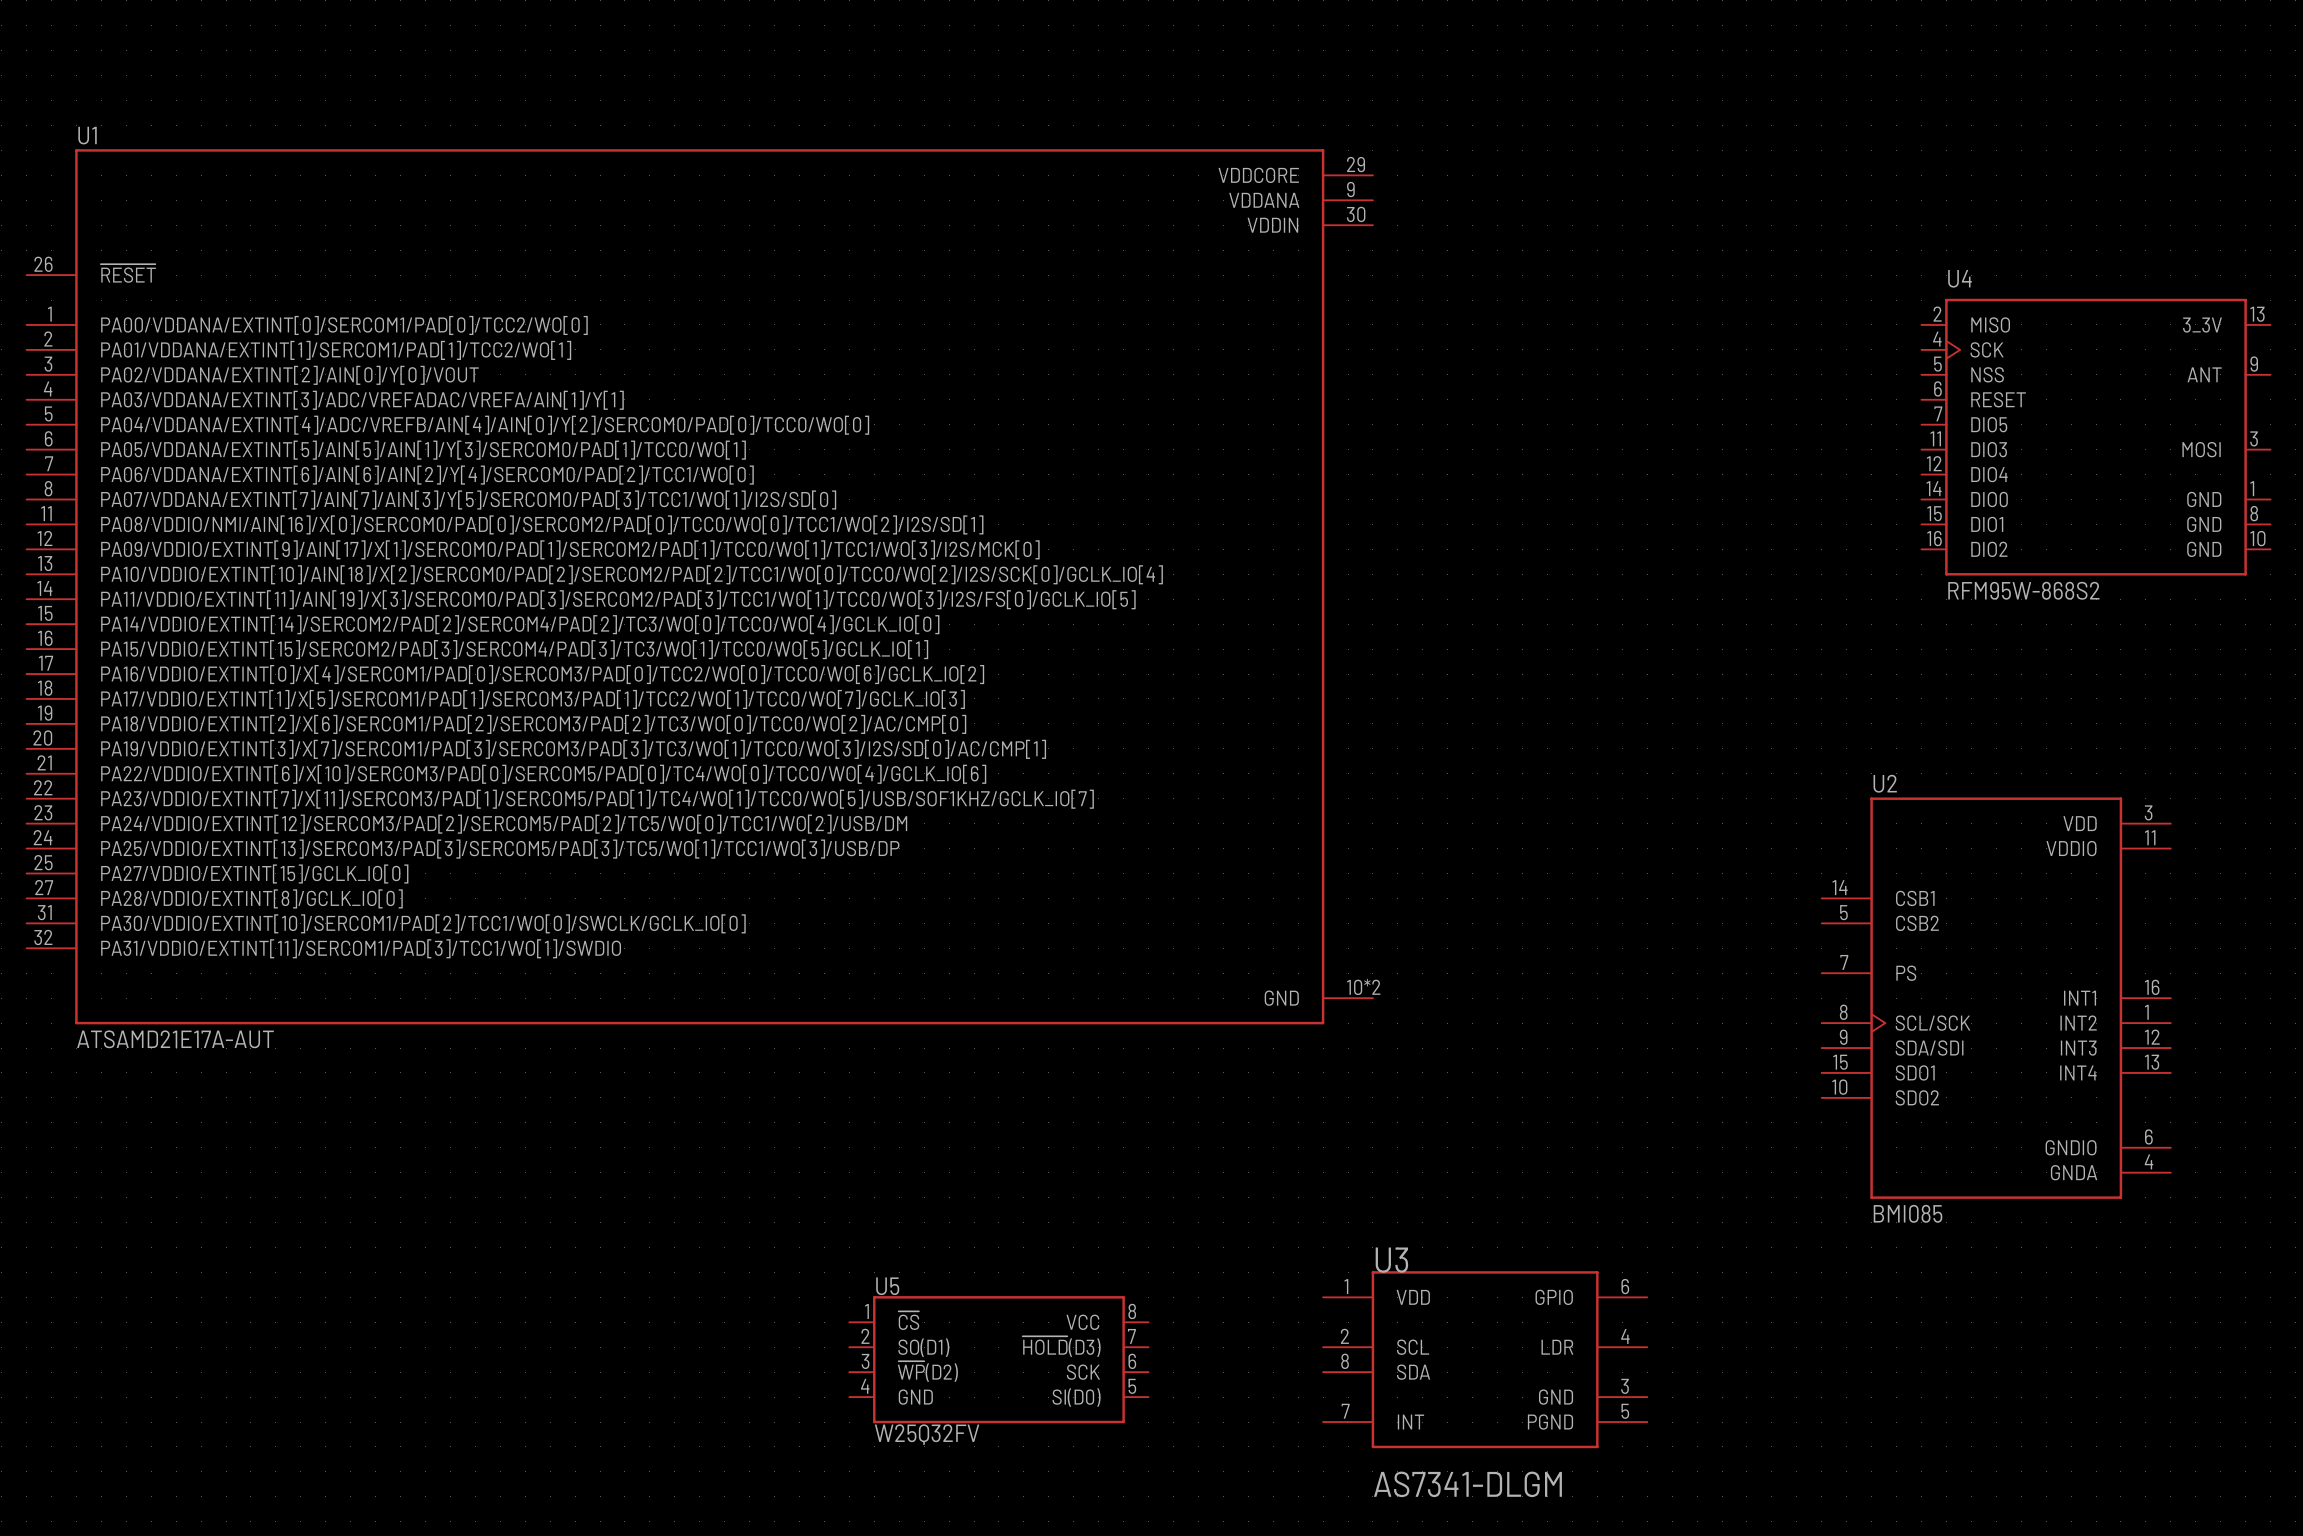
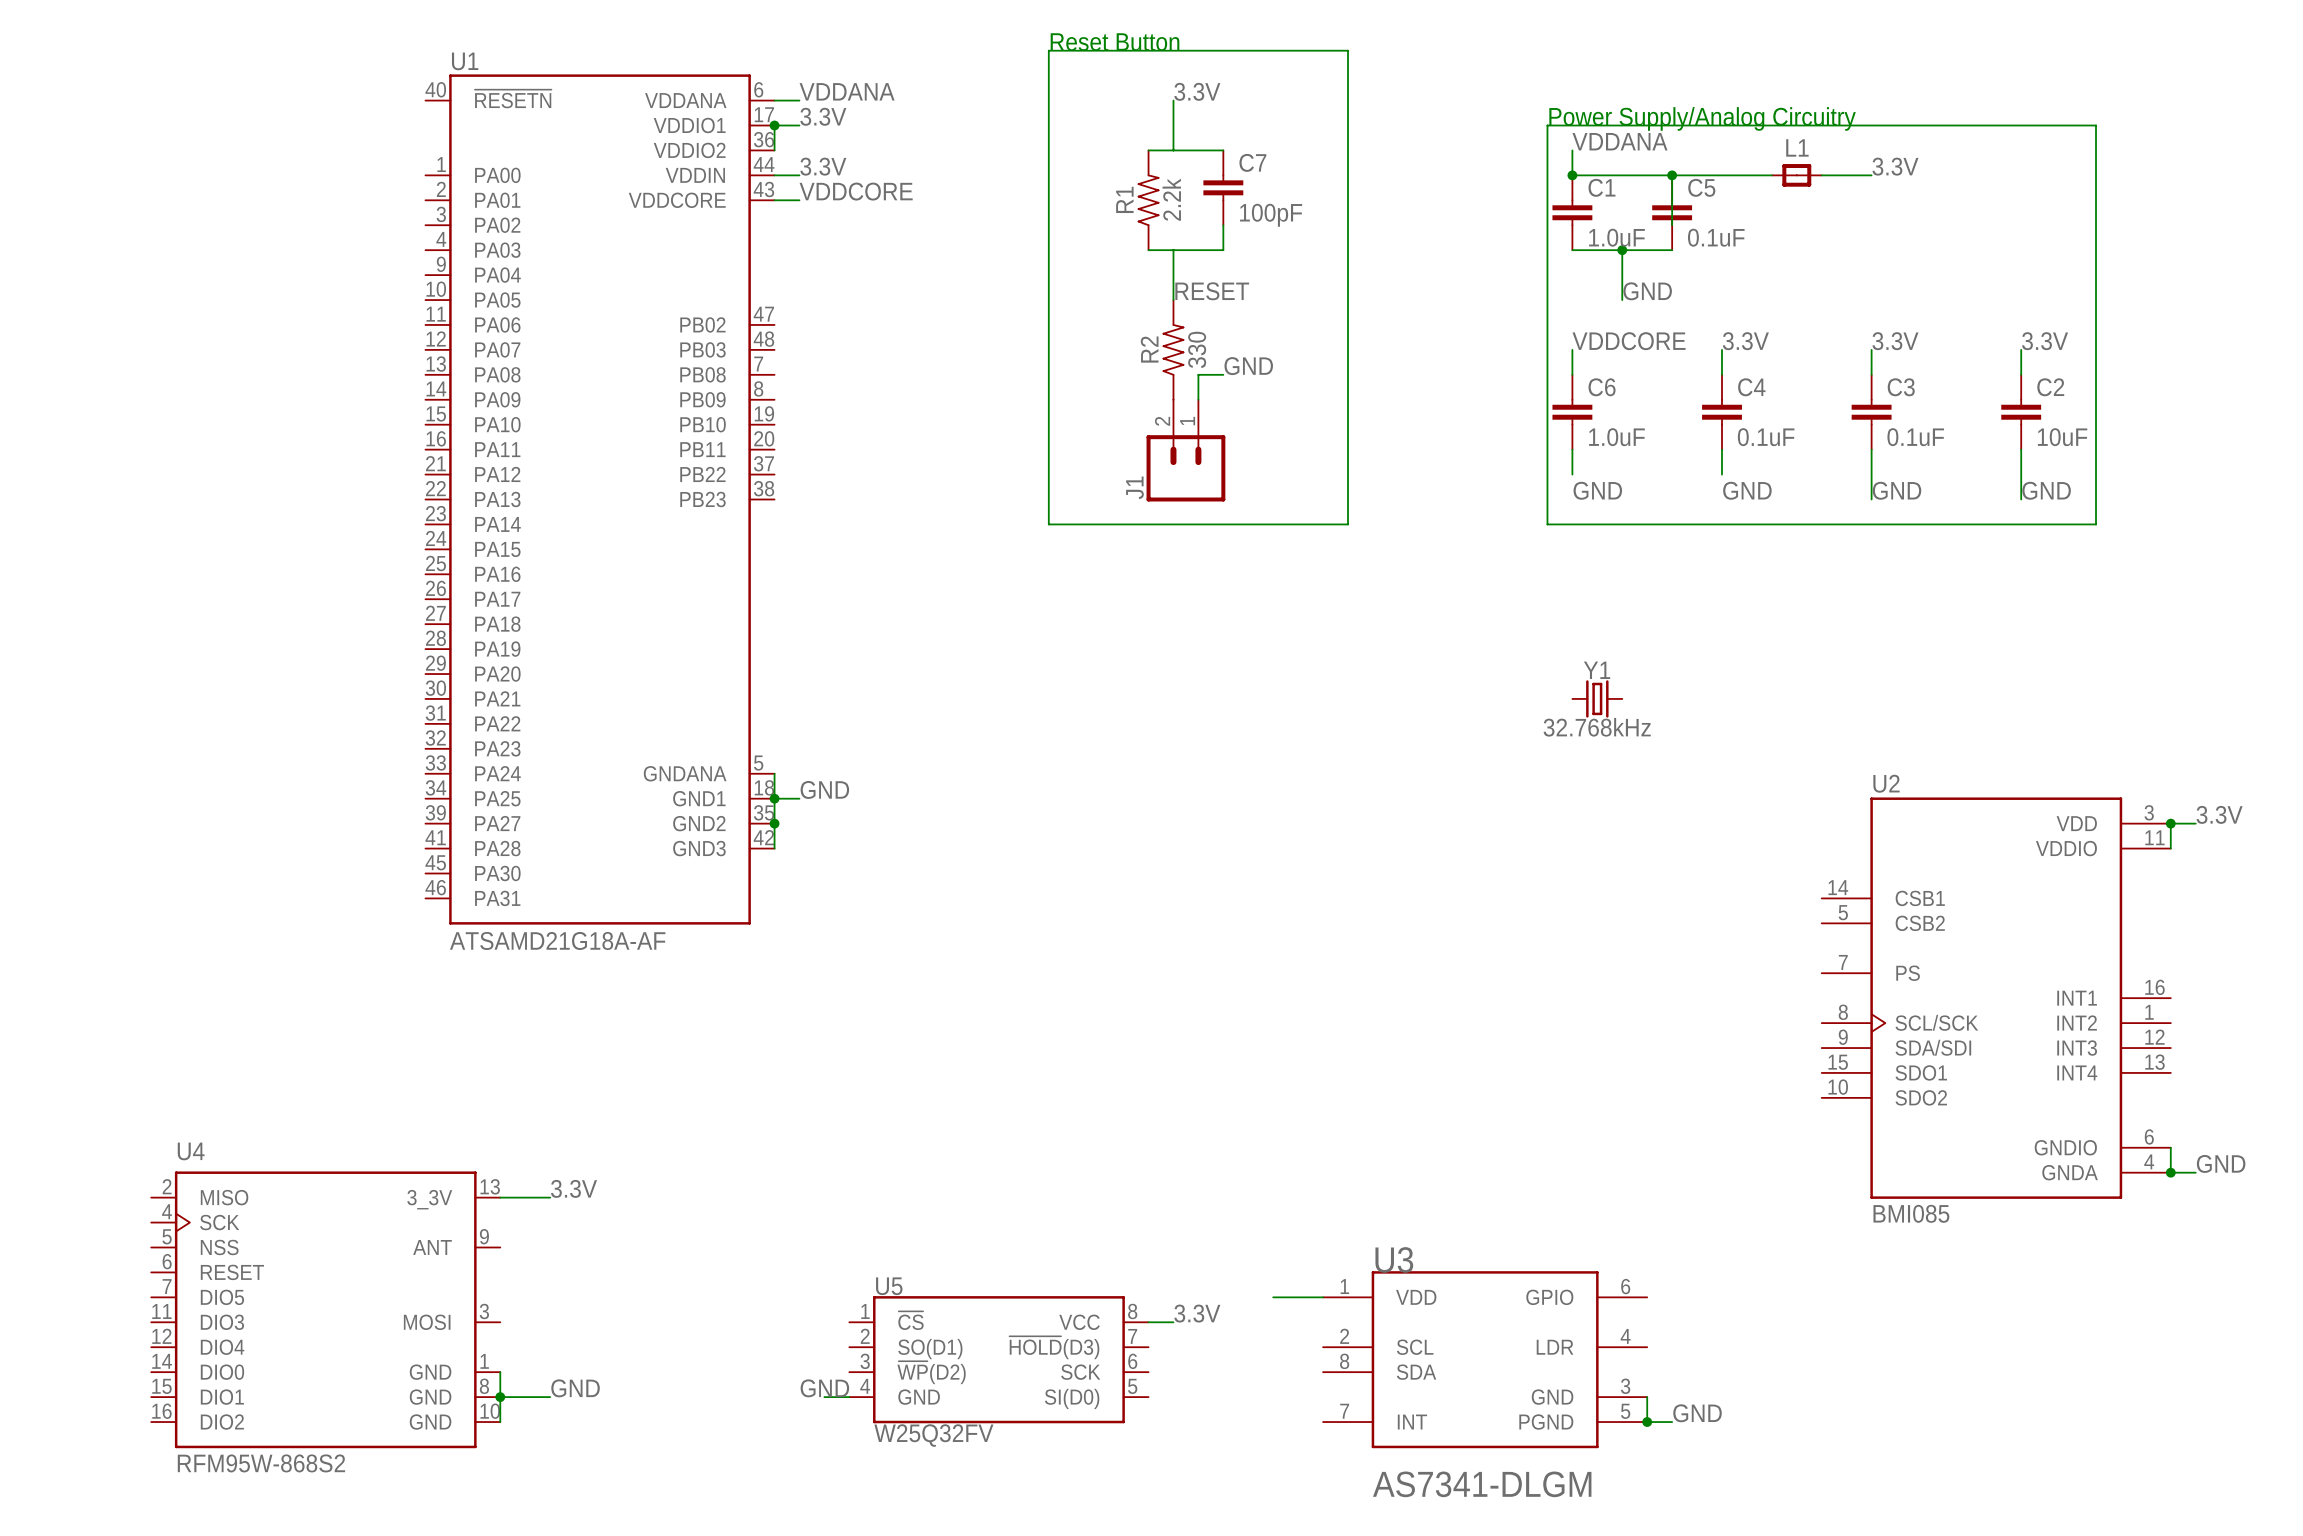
text: none -> Reset Button (1115, 42)
wire: none -> (1048, 50) (1348, 50) (1348, 524) (1048, 524) (1048, 50)
label: none -> VDDANA (847, 91)
label: none -> 3.3V (1197, 91)
wire: none -> (774, 100) (799, 100)
wire: none -> (1173, 100) (1173, 150)
label: none -> 3.3V (823, 116)
text: none -> Power Supply/Analog Circuitry (1702, 118)
junction: none -> (774, 125)
wire: none -> (799, 125) (774, 125) (774, 150)
wire: none -> (1547, 125) (2096, 125) (2096, 524) (1547, 524) (1547, 125)
U1 name position: U1 (87, 135) -> U1 (465, 61)
label: none -> VDDANA (1620, 141)
U1 symbol: [26, 149, 1373, 1025] -> [425, 74, 775, 925]
wire: none -> (1572, 150) (1572, 175) (1771, 175)
label: none -> 3.3V (823, 166)
label: none -> 3.3V (1895, 166)
wire: none -> (774, 175) (799, 175)
junction: none -> (1572, 175)
wire: none -> (1672, 175) (1672, 225)
junction: none -> (1672, 175)
L1: none -> (1796, 175)
wire: none -> (1821, 175) (1871, 175)
C7: none -> 100pF (1223, 187)
label: none -> VDDCORE (856, 191)
wire: none -> (774, 200) (799, 200)
R1: none -> 2.2k (1148, 200)
C1: none -> 1.0uF (1572, 212)
C5: none -> 0.1uF (1672, 212)
wire: none -> (1223, 225) (1223, 250) (1148, 250)
wire: none -> (1173, 250) (1173, 300)
wire: none -> (1572, 250) (1672, 250)
wire: none -> (1622, 250) (1622, 300)
junction: none -> (1622, 250)
label: none -> RESET (1212, 291)
label: none -> GND (1647, 291)
label: none -> VDDCORE (1629, 341)
label: none -> 3.3V (1745, 341)
label: none -> 3.3V (1895, 341)
label: none -> 3.3V (2045, 341)
R2: none -> 330 (1173, 349)
wire: none -> (1572, 349) (1572, 374)
wire: none -> (1722, 349) (1722, 374)
wire: none -> (1871, 349) (1871, 374)
wire: none -> (2021, 349) (2021, 374)
label: none -> GND (1248, 366)
wire: none -> (1223, 374) (1198, 374) (1198, 399)
C6: none -> 1.0uF (1572, 412)
C4: none -> 0.1uF (1722, 412)
C3: none -> 0.1uF (1871, 412)
C2: none -> 10uF (2021, 412)
U4 position: (2096, 437) -> (325, 1309)
wire: none -> (1572, 449) (1572, 474)
wire: none -> (1722, 449) (1722, 474)
wire: none -> (1871, 449) (1871, 499)
wire: none -> (2021, 449) (2021, 499)
J1: none -> (1185, 450)
label: none -> GND (1597, 490)
label: none -> GND (1747, 490)
label: none -> GND (1897, 490)
label: none -> GND (2046, 490)
Y1: none -> 32.768kHz (1597, 698)
wire: none -> (774, 773) (774, 848)
label: none -> GND (824, 789)
wire: none -> (774, 798) (799, 798)
junction: none -> (774, 798)
label: none -> 3.3V (2219, 814)
junction: none -> (774, 823)
junction: none -> (2170, 823)
wire: none -> (2195, 823) (2170, 823) (2170, 848)
U1 value: ATSAMD21E17A-AUT (175, 1039) -> ATSAMD21G18A-AF (557, 940)
wire: none -> (2170, 1147) (2170, 1172) (2195, 1172)
label: none -> GND (2221, 1163)
junction: none -> (2170, 1172)
label: none -> 3.3V (574, 1188)
wire: none -> (500, 1197) (550, 1197)
wire: none -> (1273, 1297) (1323, 1297)
label: none -> 3.3V (1197, 1313)
wire: none -> (1148, 1322) (1173, 1322)
wire: none -> (500, 1372) (500, 1422)
label: none -> GND (575, 1388)
label: none -> GND (824, 1388)
wire: none -> (500, 1397) (550, 1397)
junction: none -> (500, 1397)
wire: none -> (824, 1397) (849, 1397)
wire: none -> (1647, 1397) (1647, 1422) (1672, 1422)
label: none -> GND (1697, 1413)
junction: none -> (1647, 1422)

